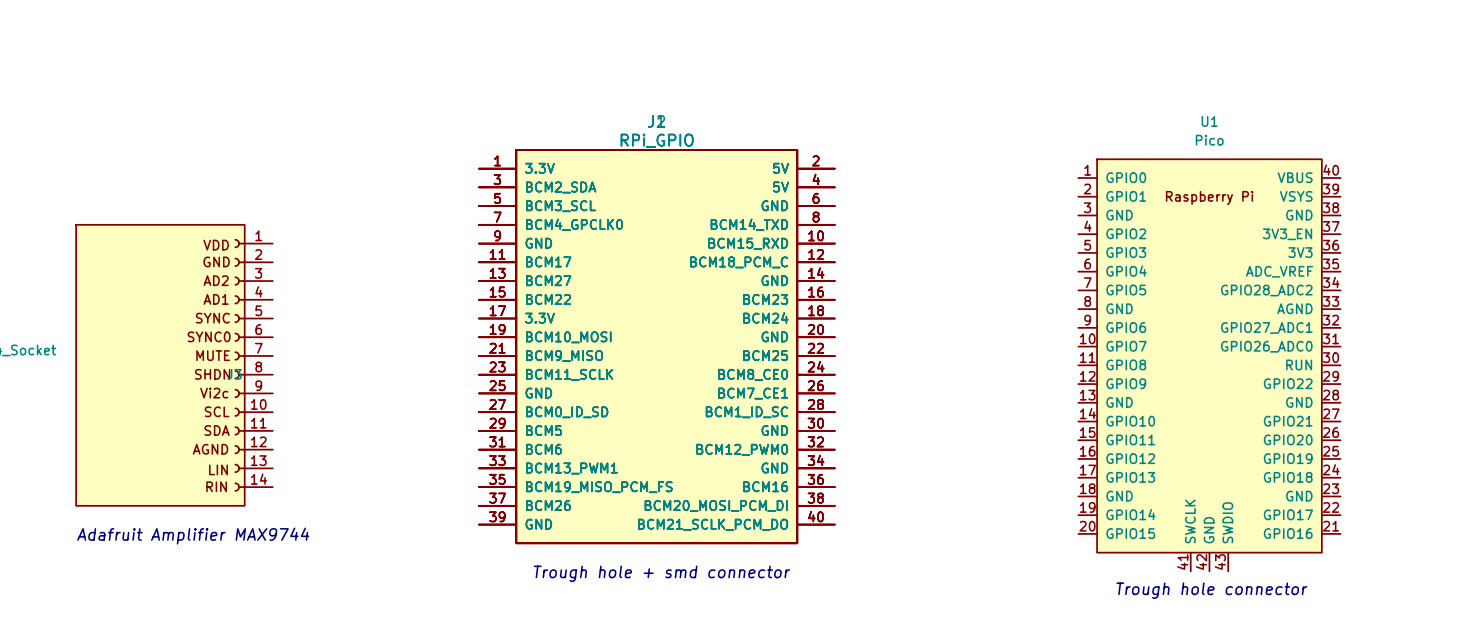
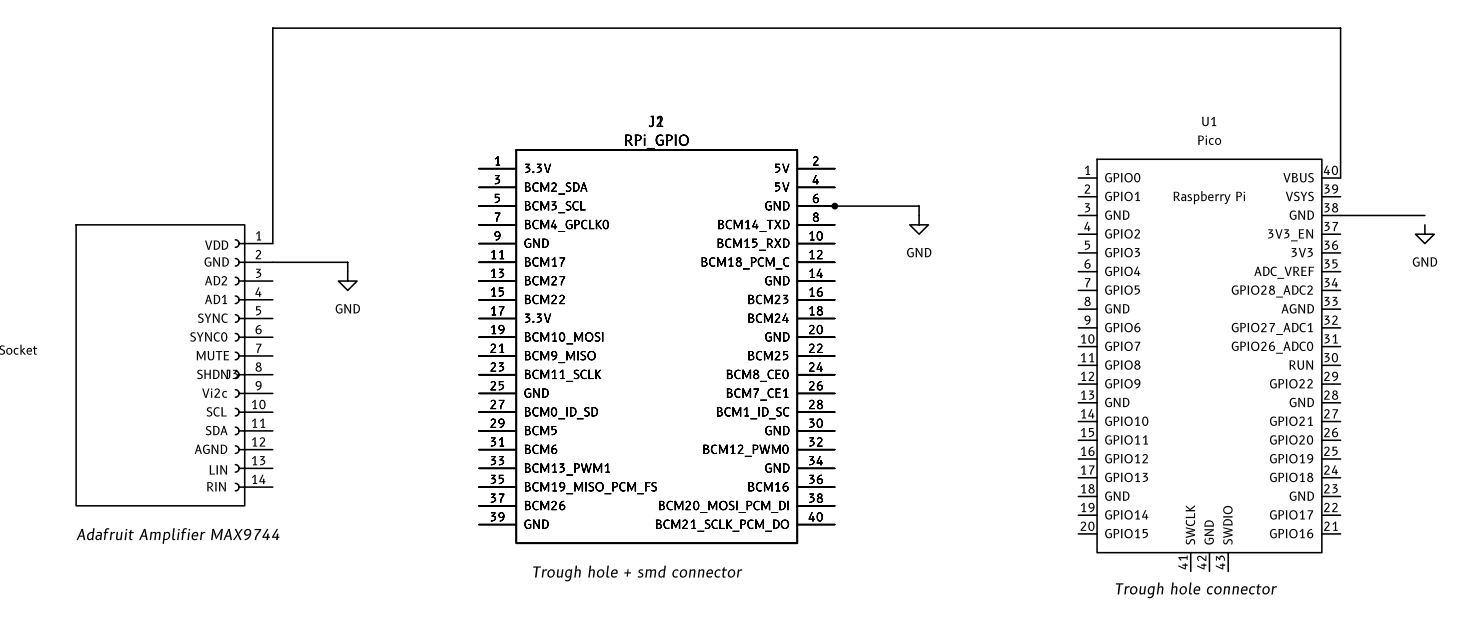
wire: none -> (1340, 178) (1340, 28) (272, 28) (272, 243)
wire: none -> (834, 206) (919, 206) (919, 215)
junction: none -> (834, 206)
wire: none -> (1340, 215) (1424, 215)
power symbol: none -> GND (919, 224)
power symbol: none -> GND (1424, 234)
wire: none -> (272, 262) (347, 262) (347, 271)
power symbol: none -> GND (347, 281)

